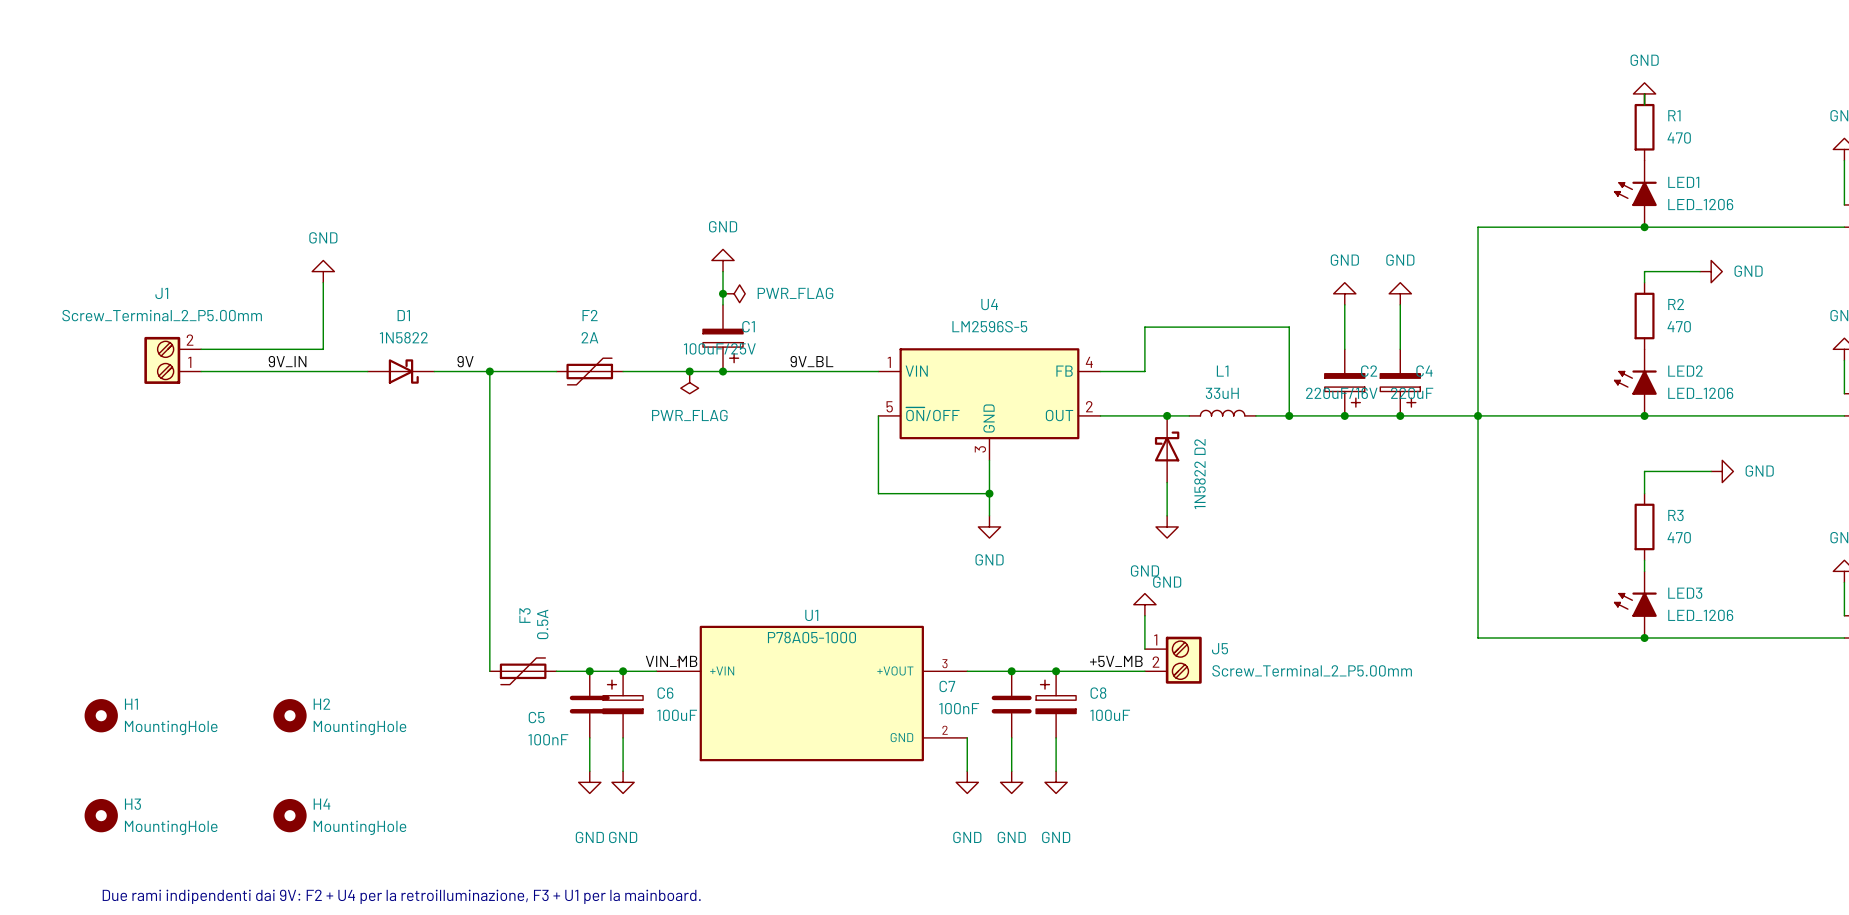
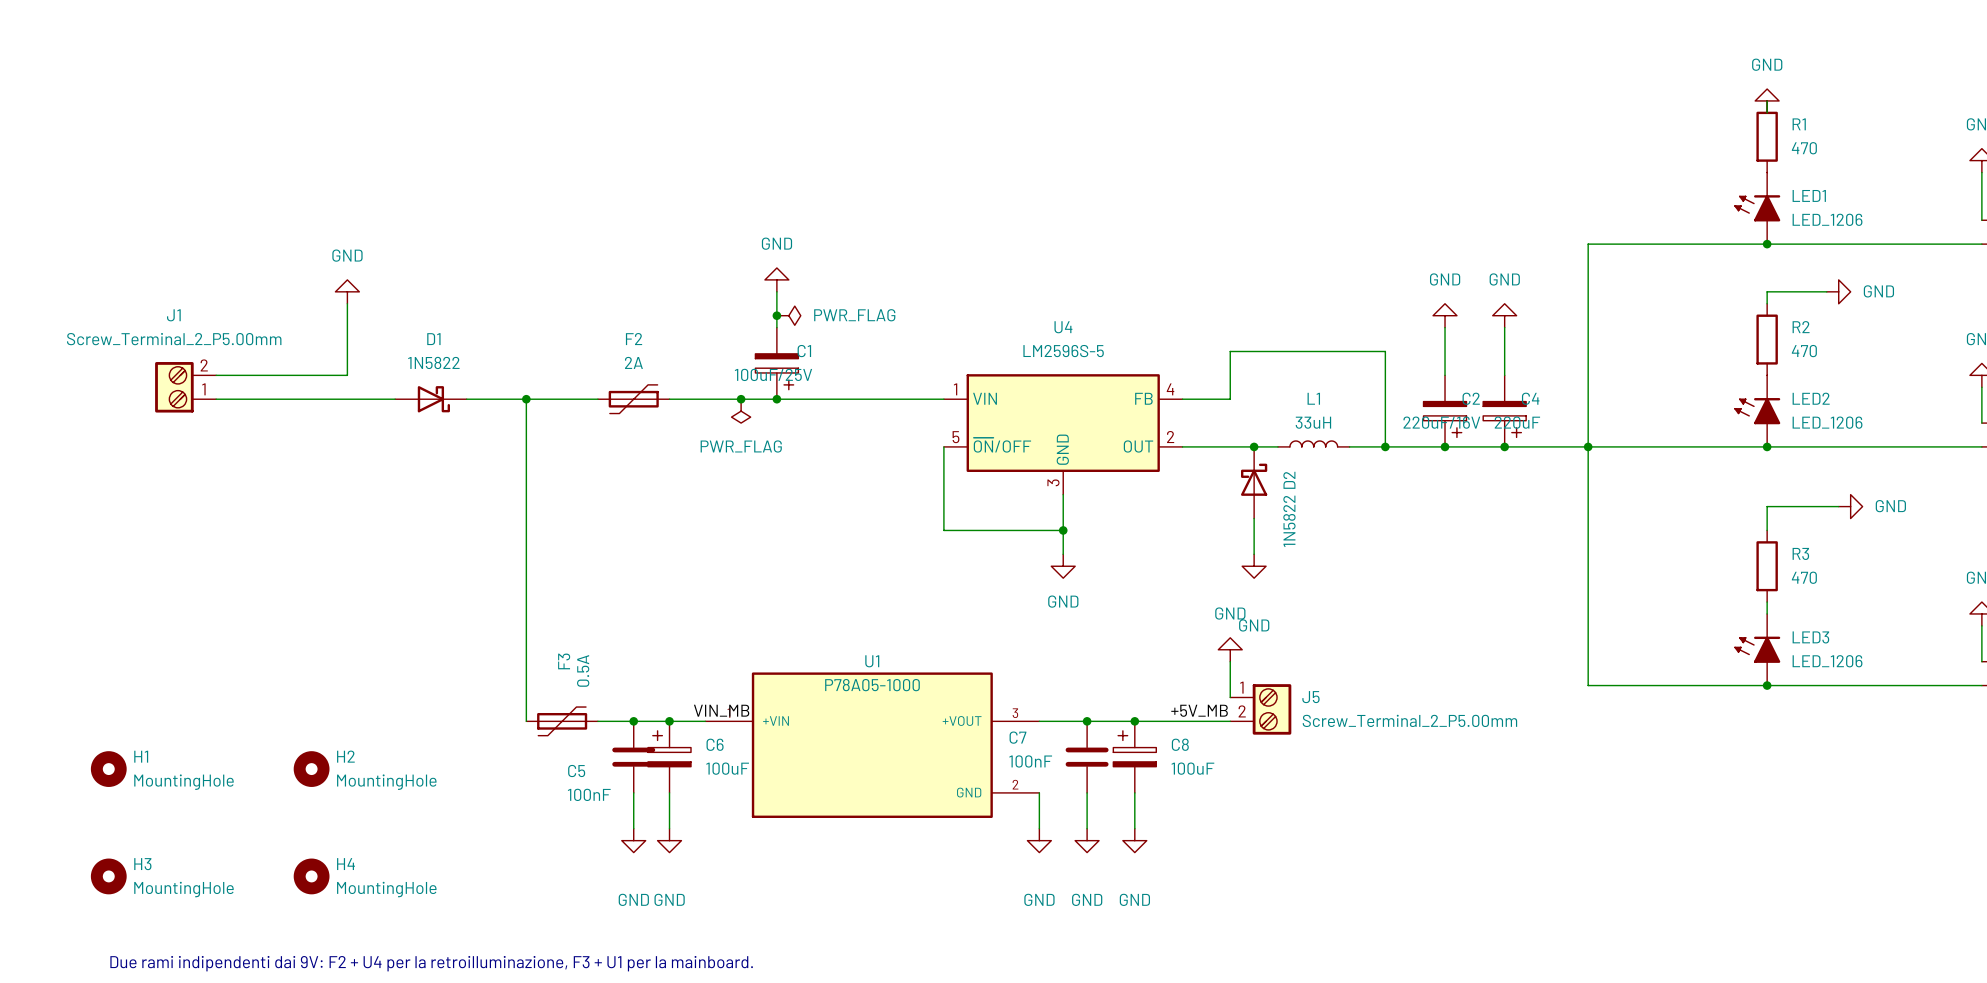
label: 9V_IN (287, 361) -> none
label: 9V (465, 361) -> none
label: 9V_BL (811, 361) -> none

